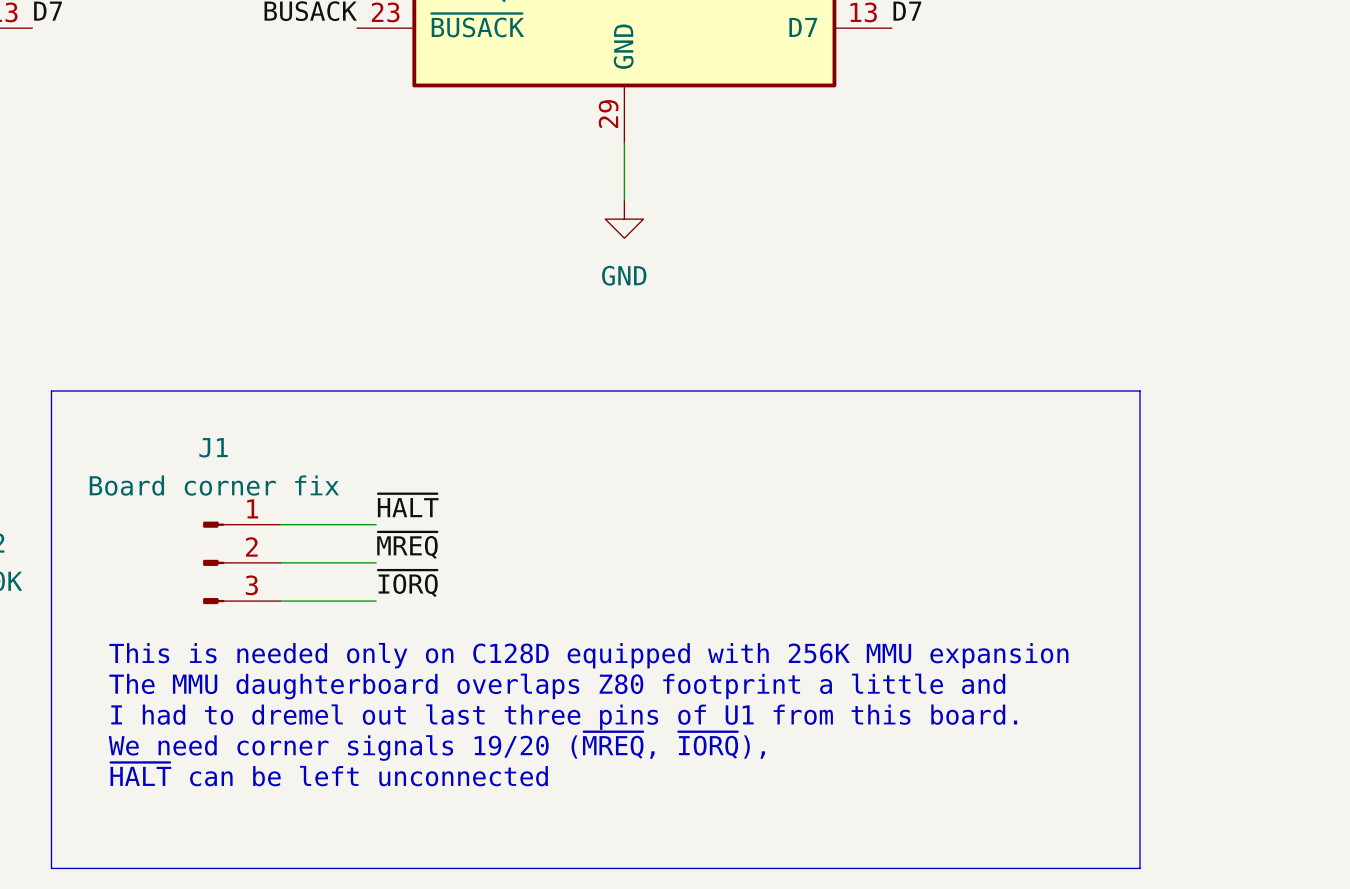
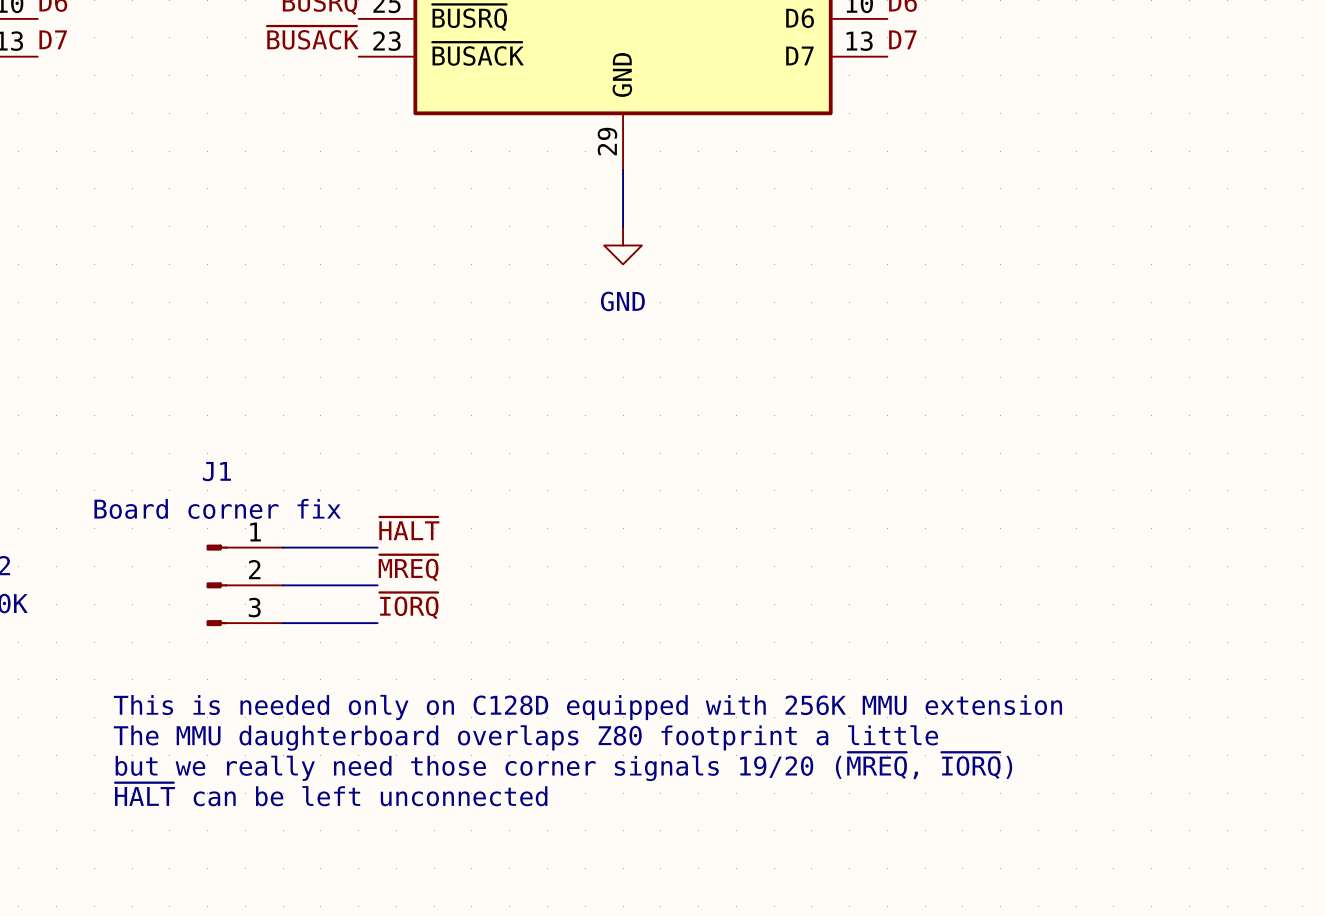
line: (51, 391) (51, 868) (1140, 868) (1140, 391) (51, 391) -> none
text: This is needed only on C128D equipped with 256K MMU expansion (588, 655) -> none
text: The MMU daughterboard overlaps Z80 footprint a little and (557, 686) -> This is needed only on C128D equipped with 256K MMU extension (587, 707)
text: I had to dremel out last three pins of U1 from this board. (564, 717) -> The MMU daughterboard overlaps Z80 footprint a little (525, 737)
text: We need corner signals 19/20 (~{MREQ}, ~{IORQ}), (436, 746) -> but we really need those corner signals 19/20 (~{MREQ}, ~{IORQ}) (563, 766)

